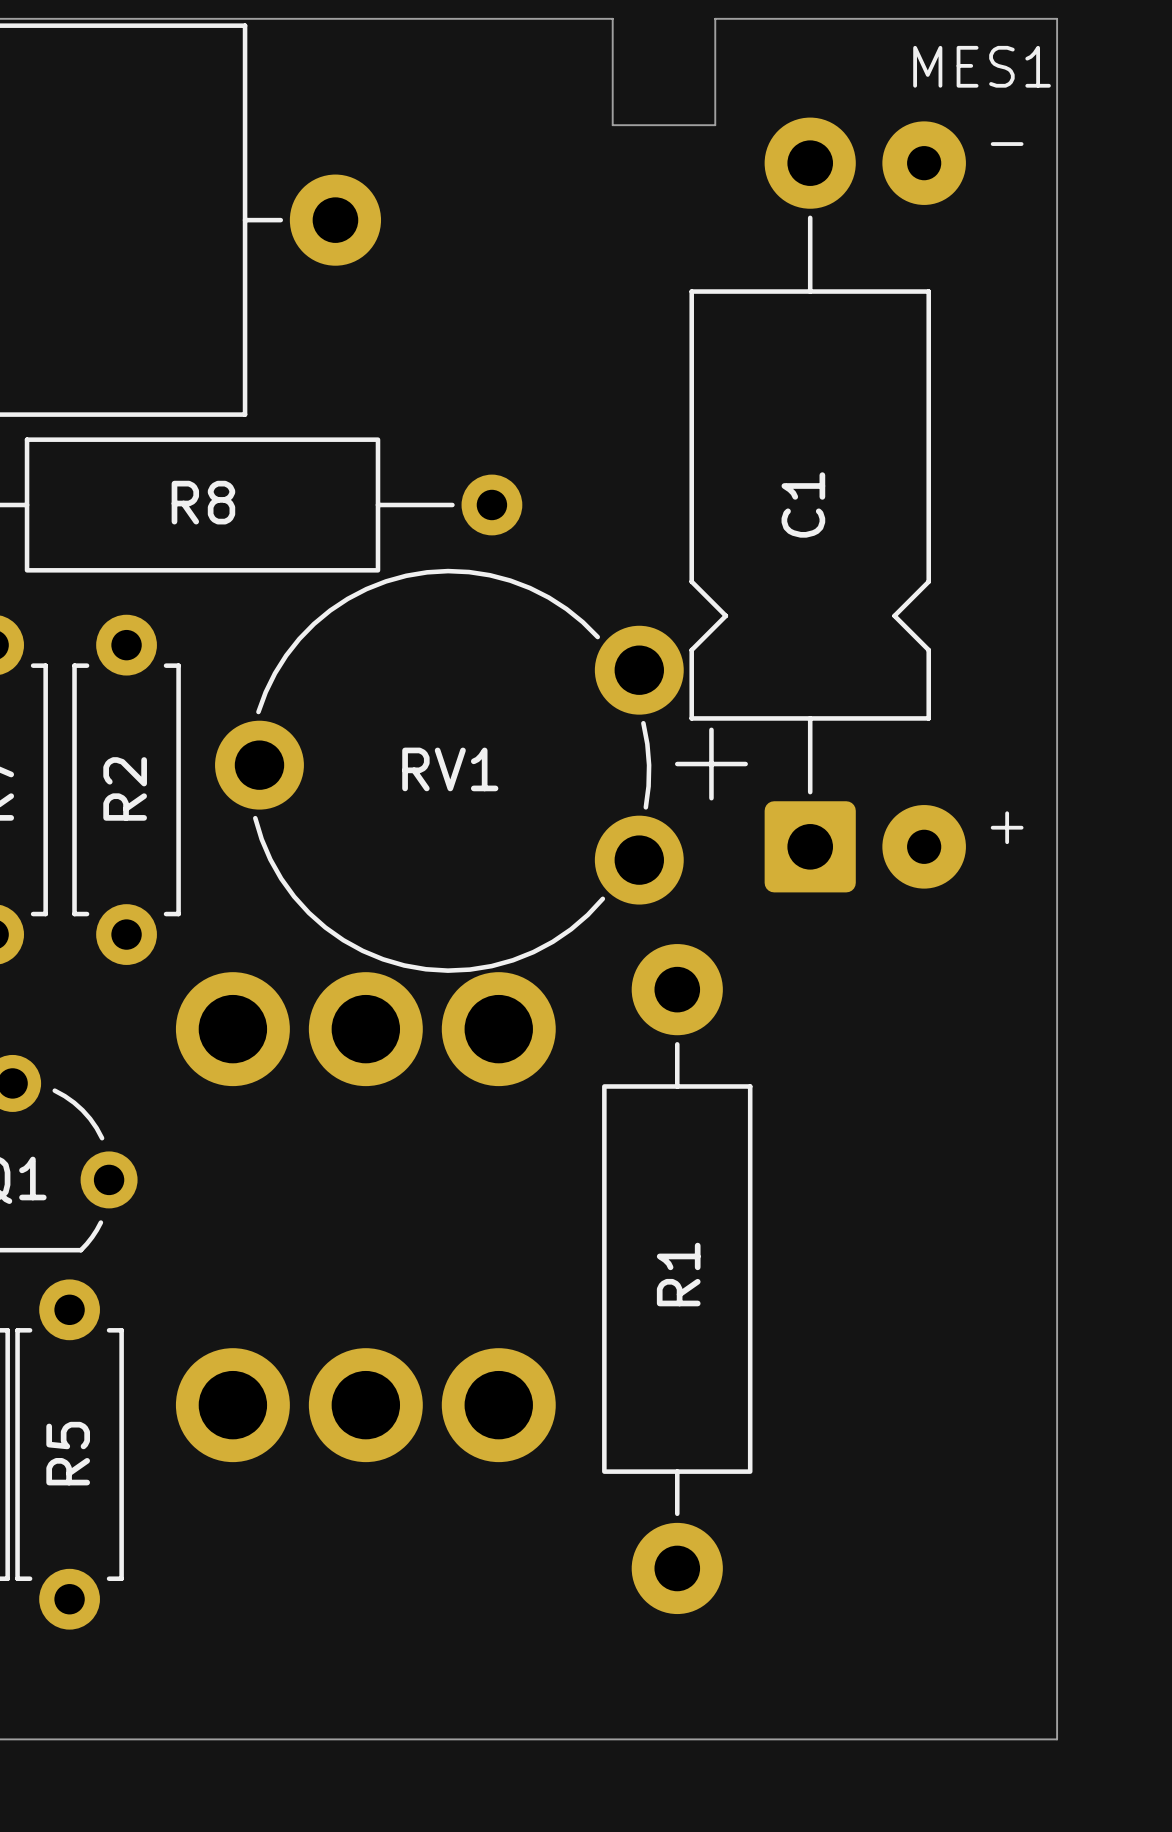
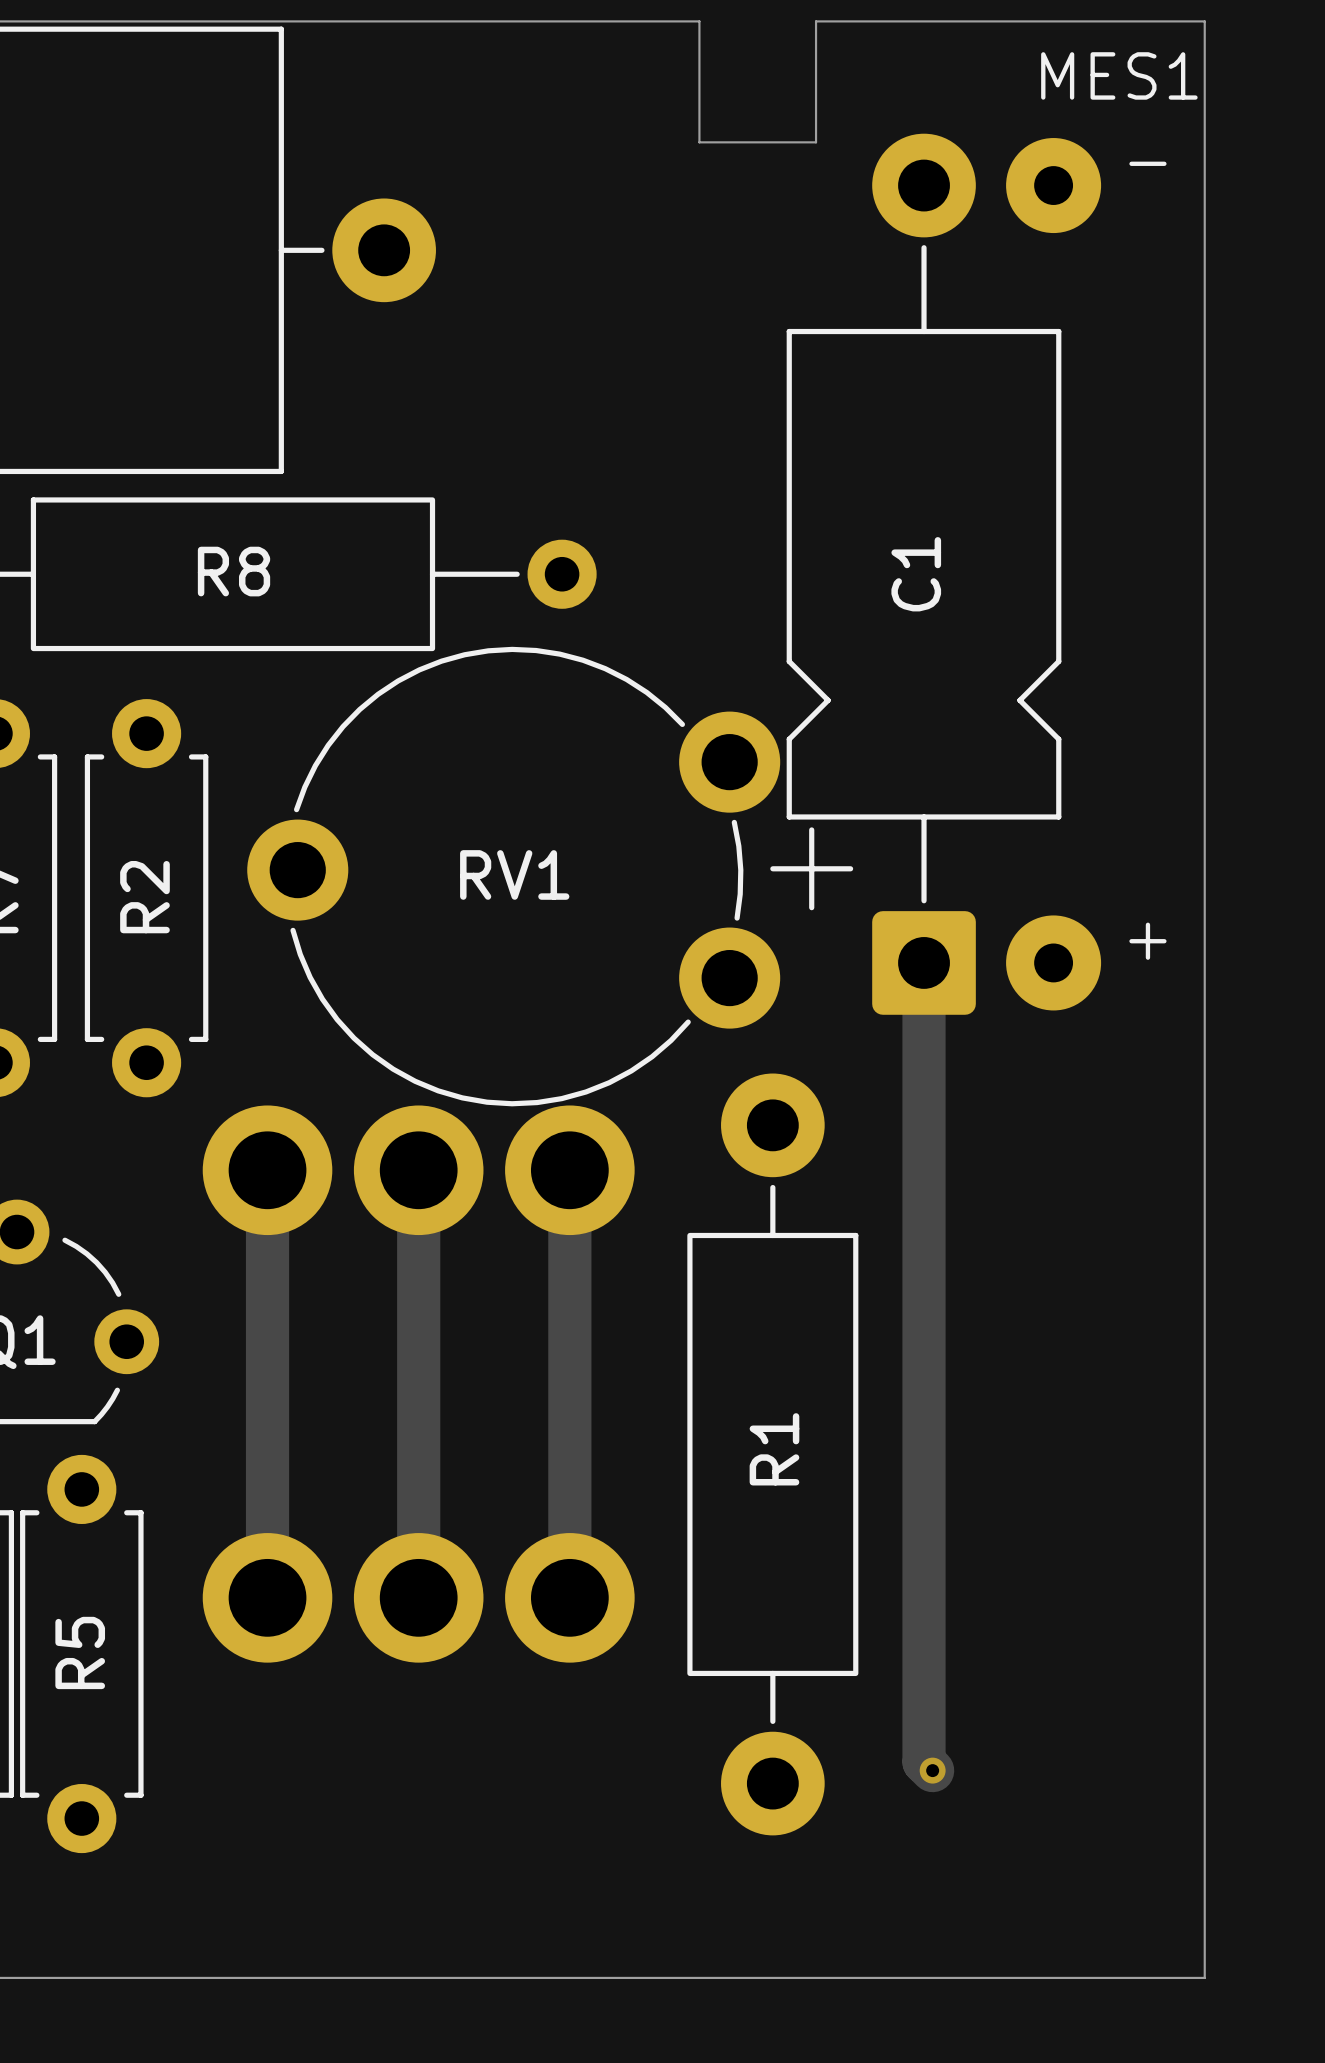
track: none -> (924, 962) (924, 1761) (932, 1770)
track: none -> (267, 1170) (267, 1597)
track: none -> (418, 1170) (418, 1597)
track: none -> (569, 1170) (569, 1597)
via: none -> (932, 1770)

